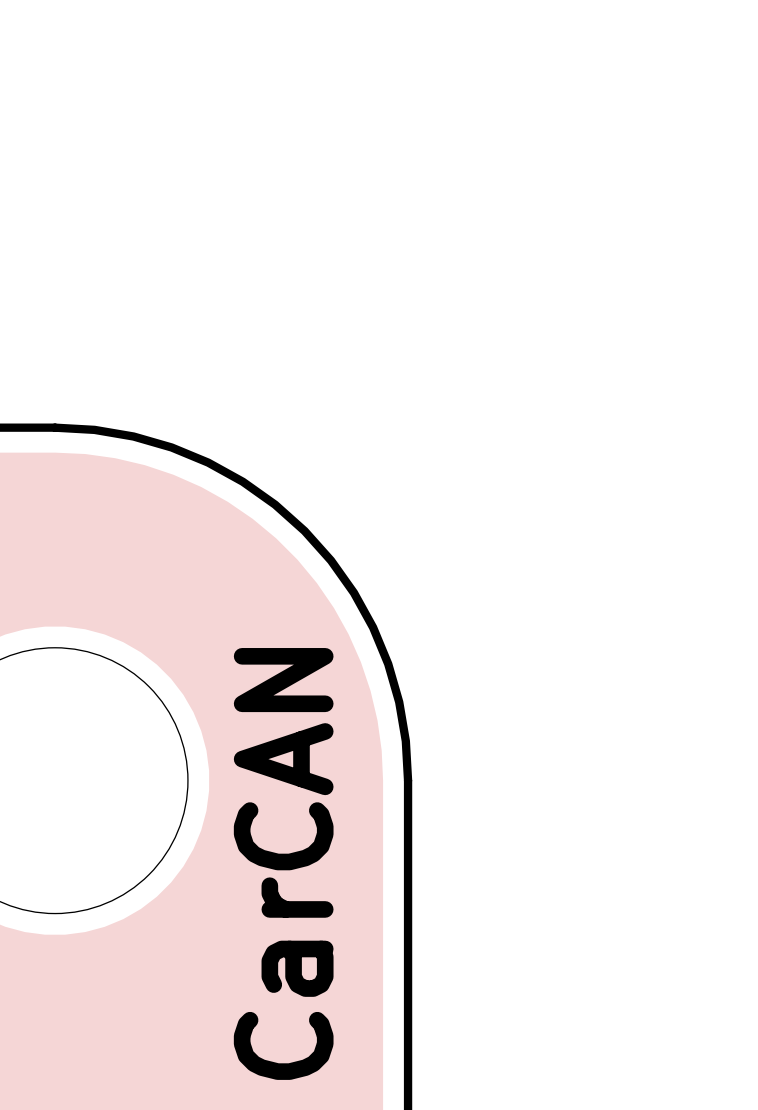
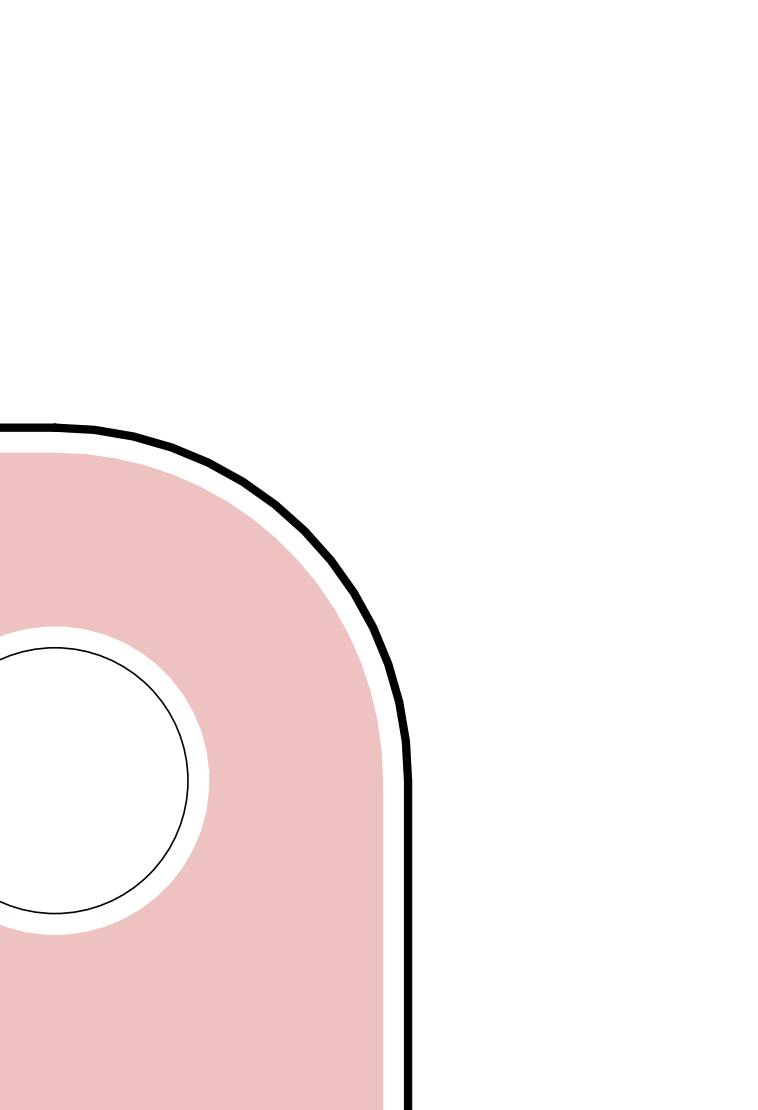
text: CarCAN (283, 863) -> none

